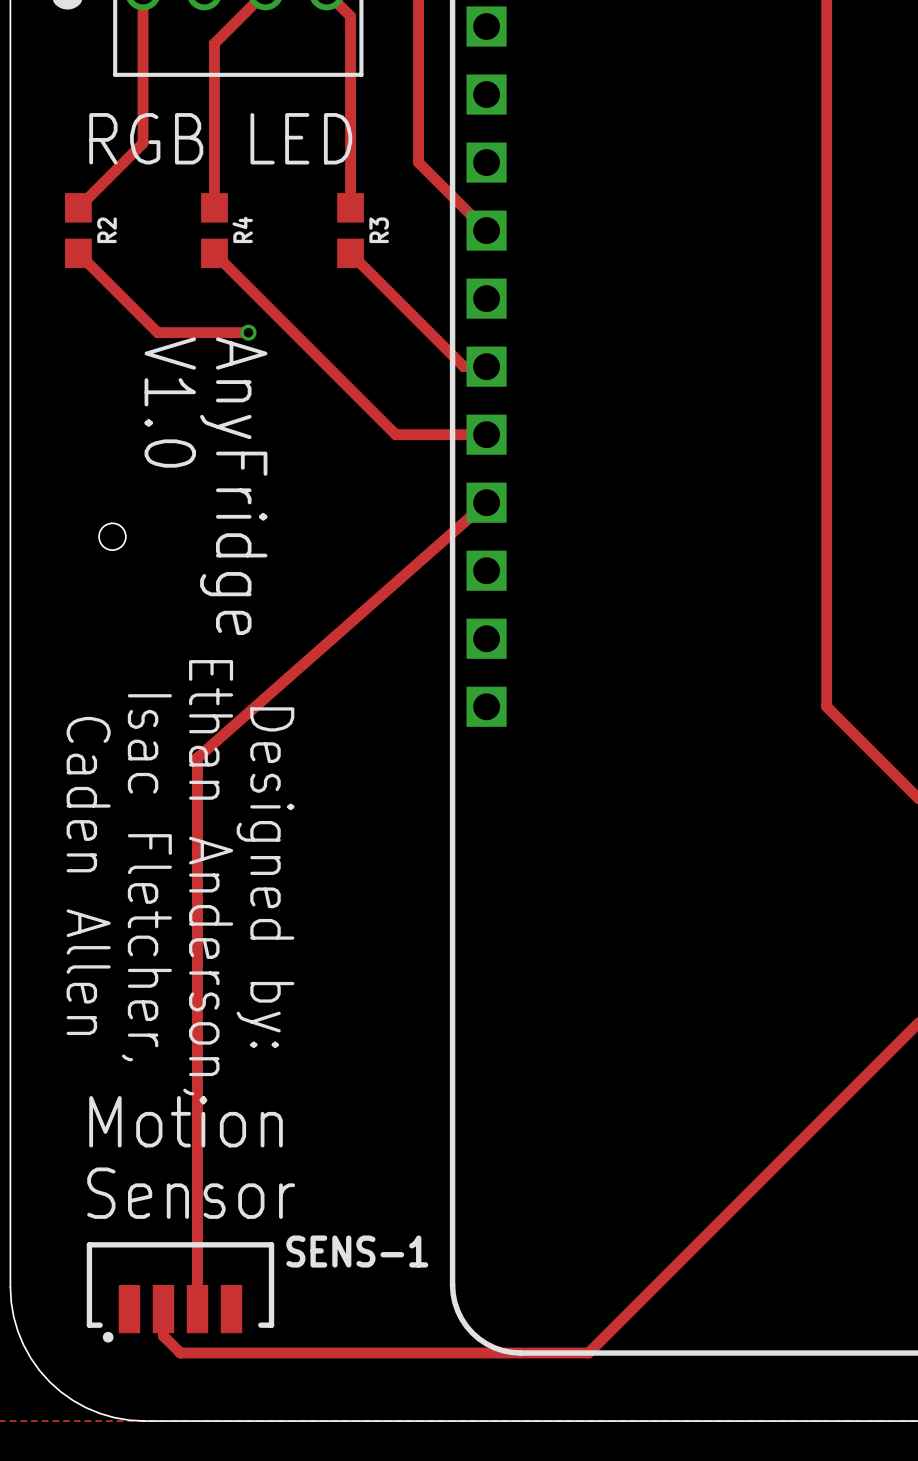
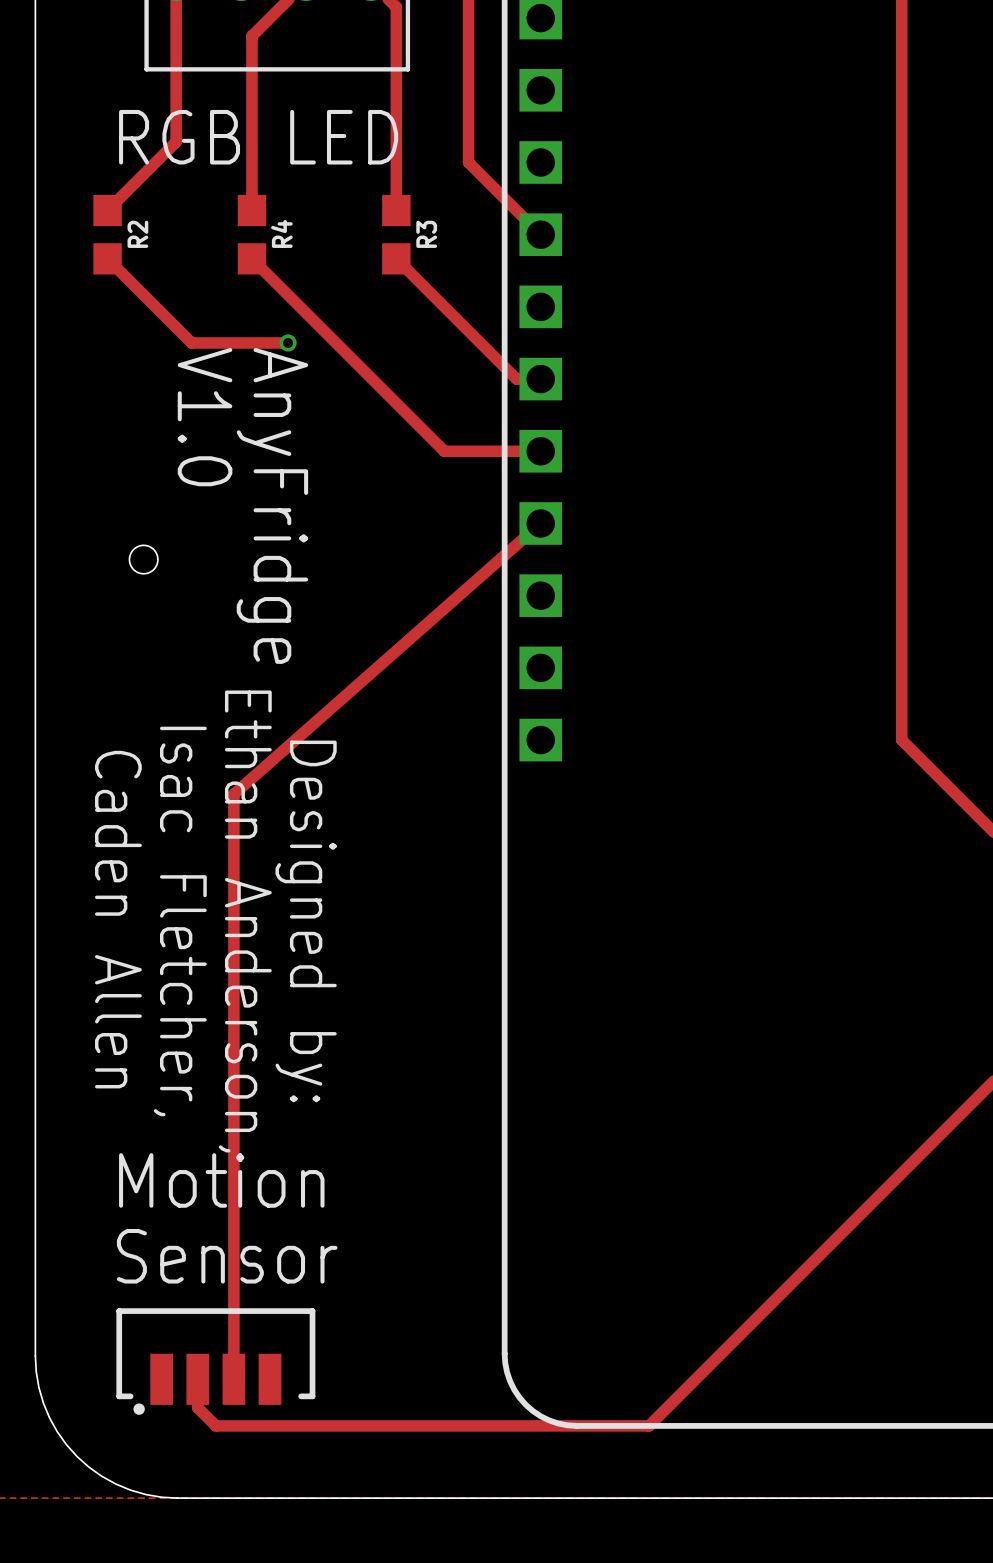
SENS-1 name: SENS-1 (357, 1251) -> none

